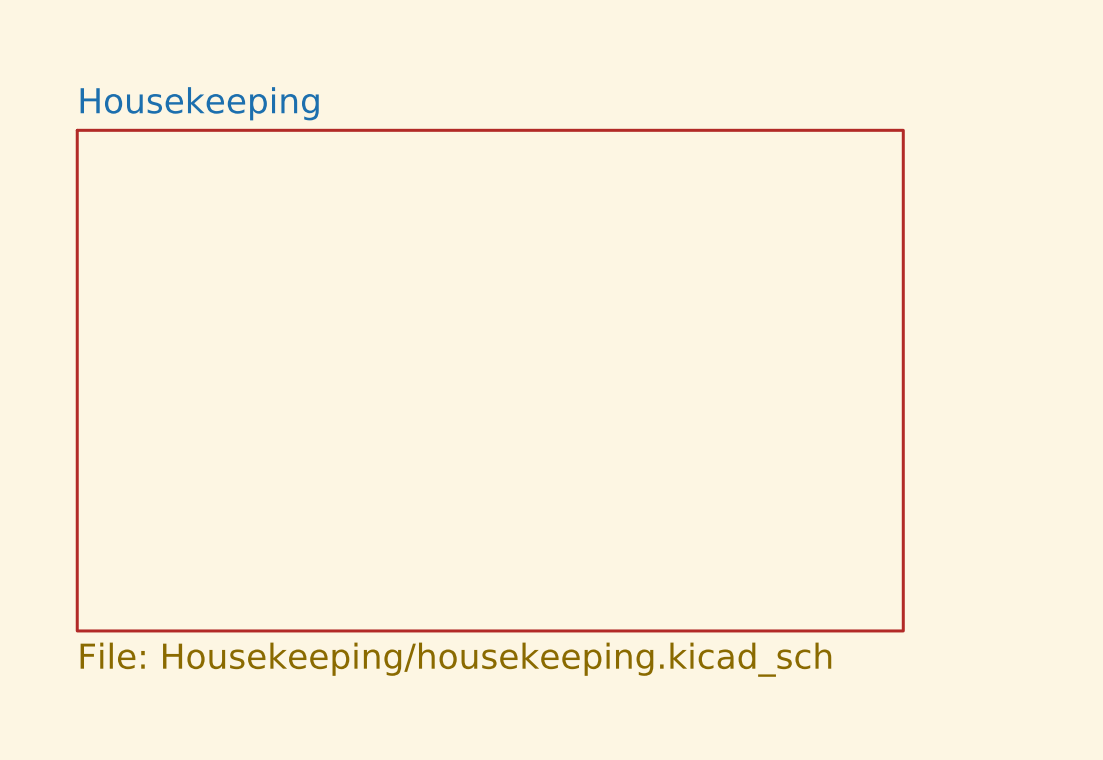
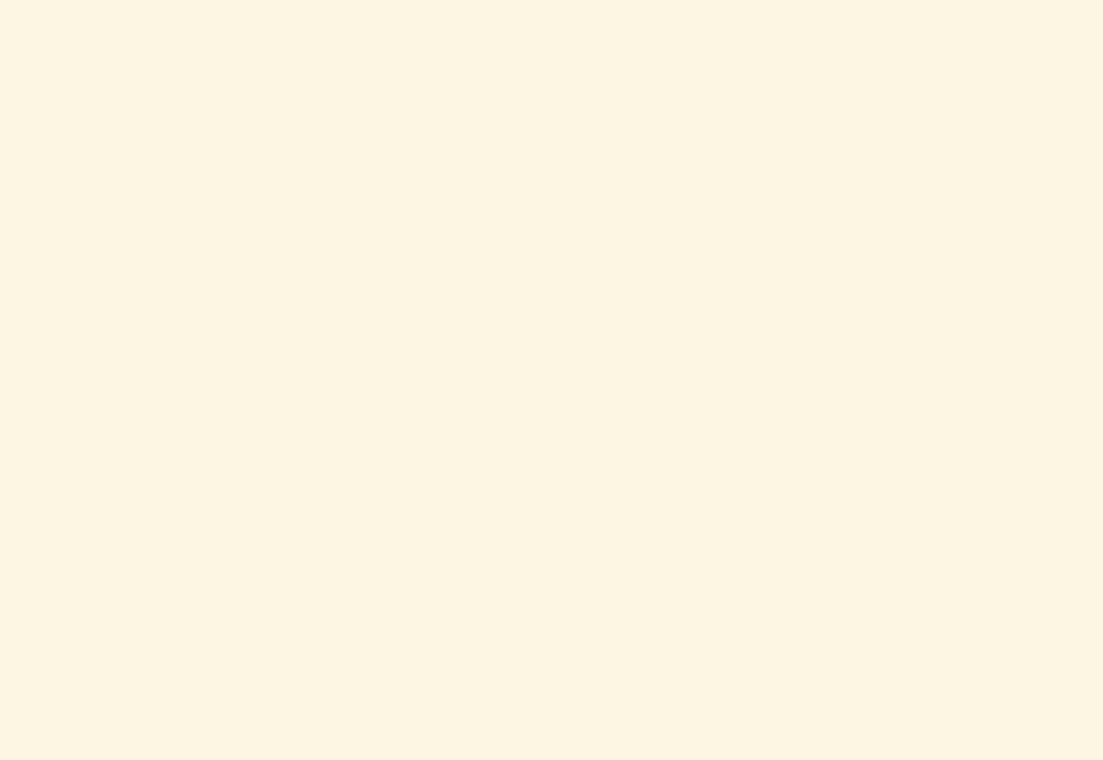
sheet Housekeeping: File: Housekeeping/housekeeping.kicad_sch (490, 380) -> none

